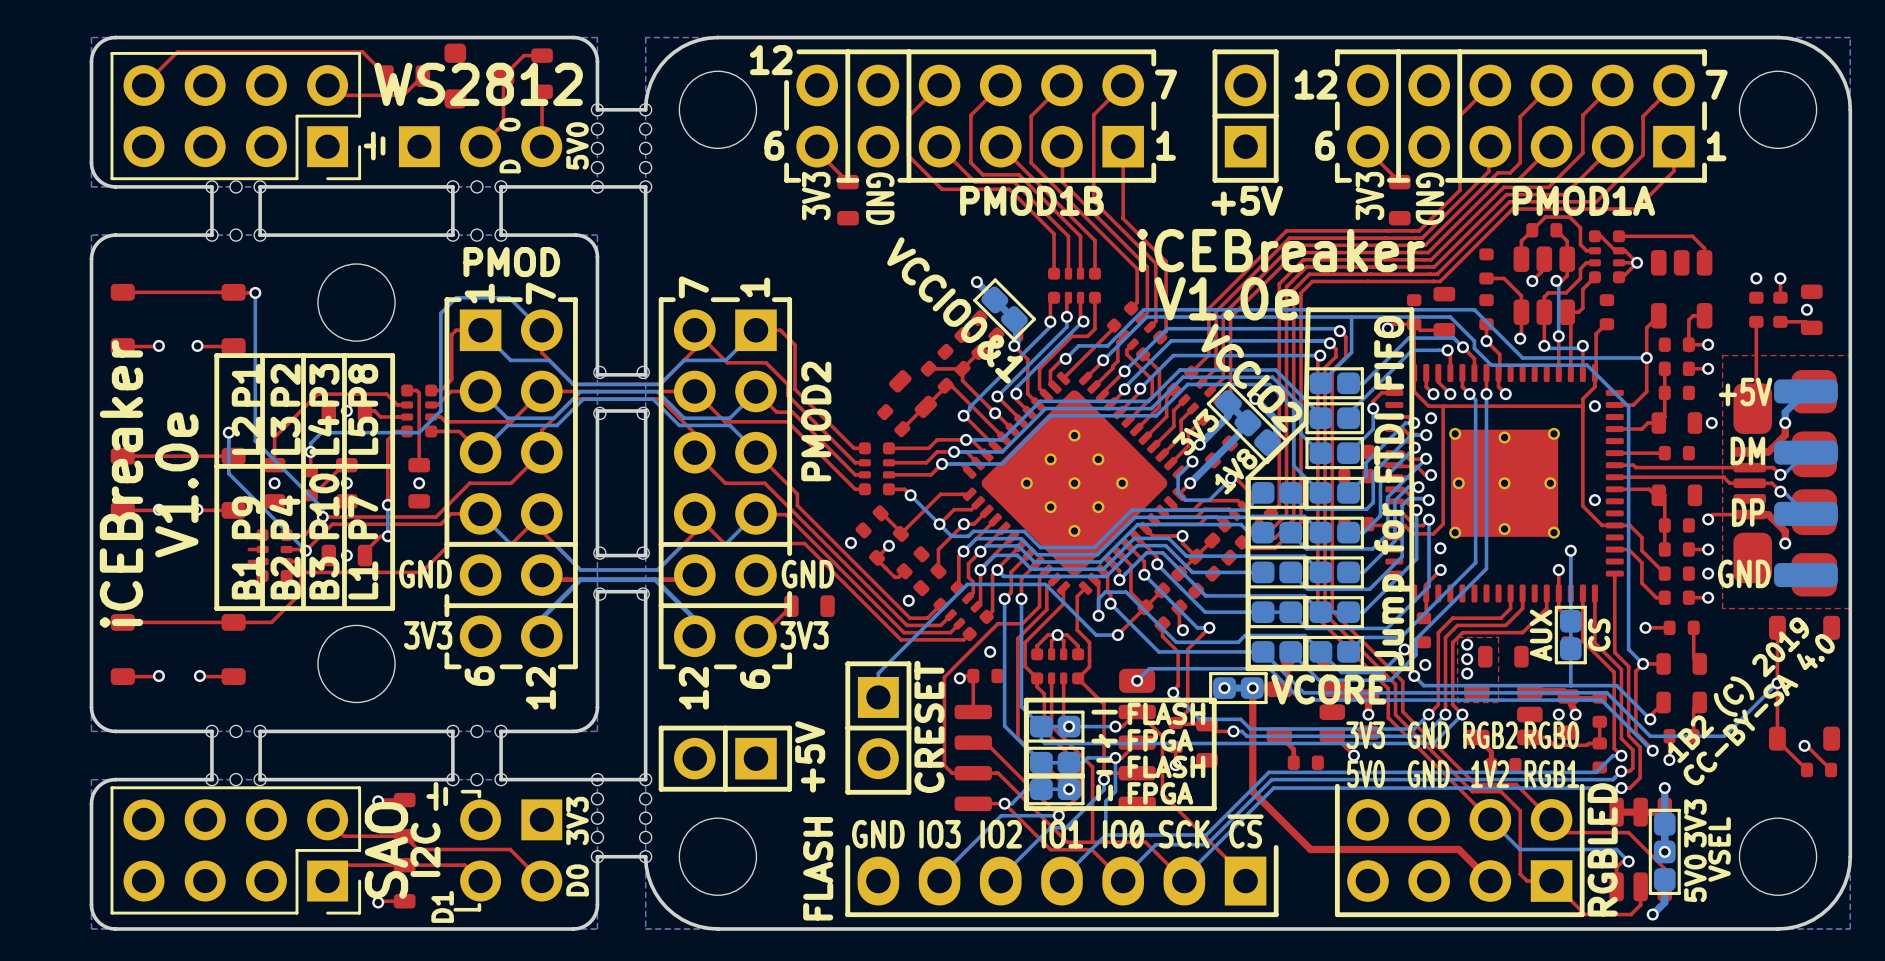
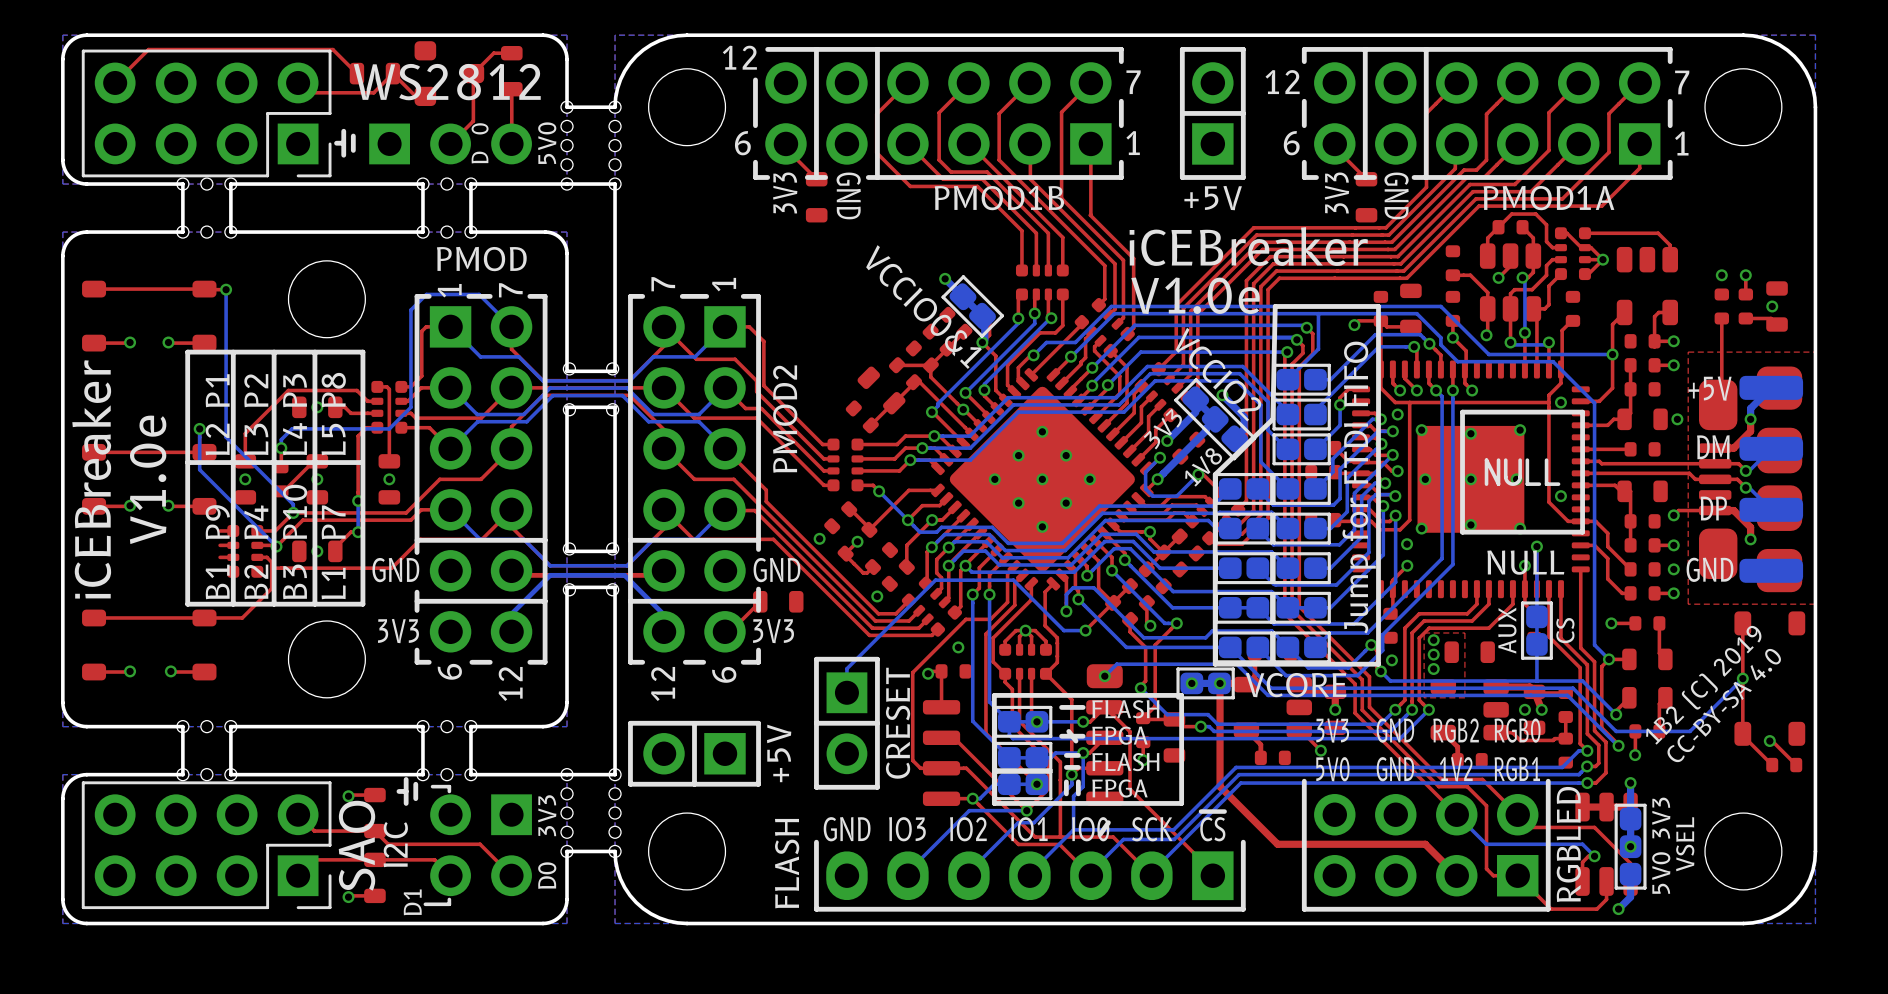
drawing: none -> [1460, 409, 1585, 535]
text: none -> NULL (1525, 562)

